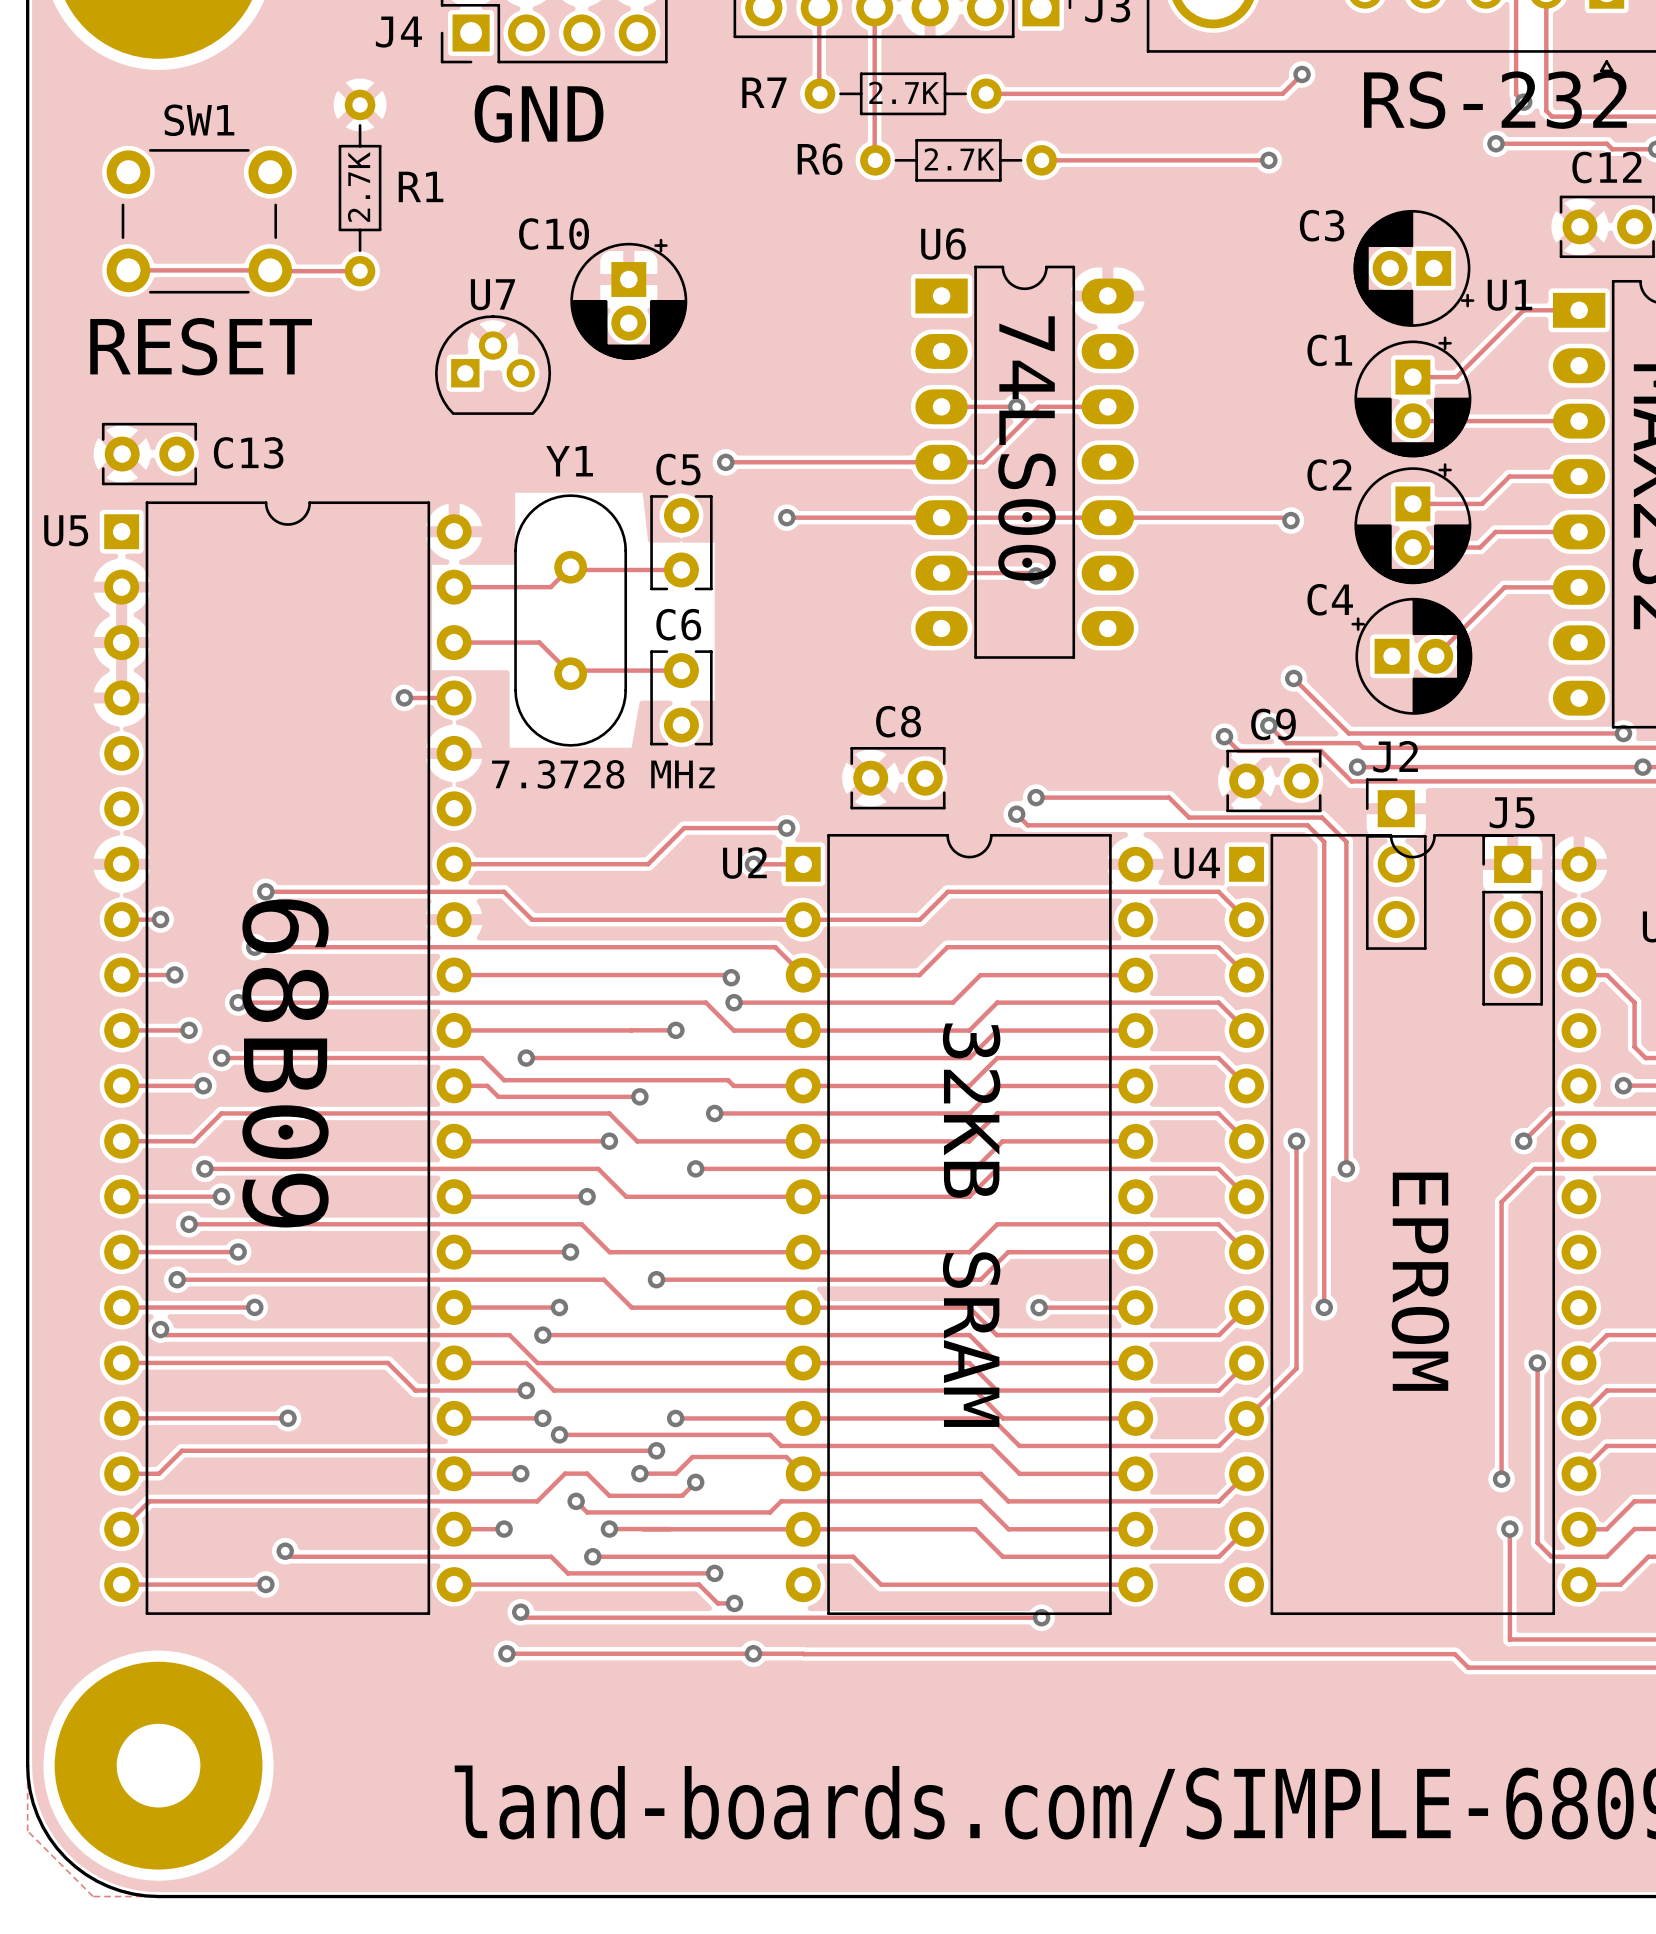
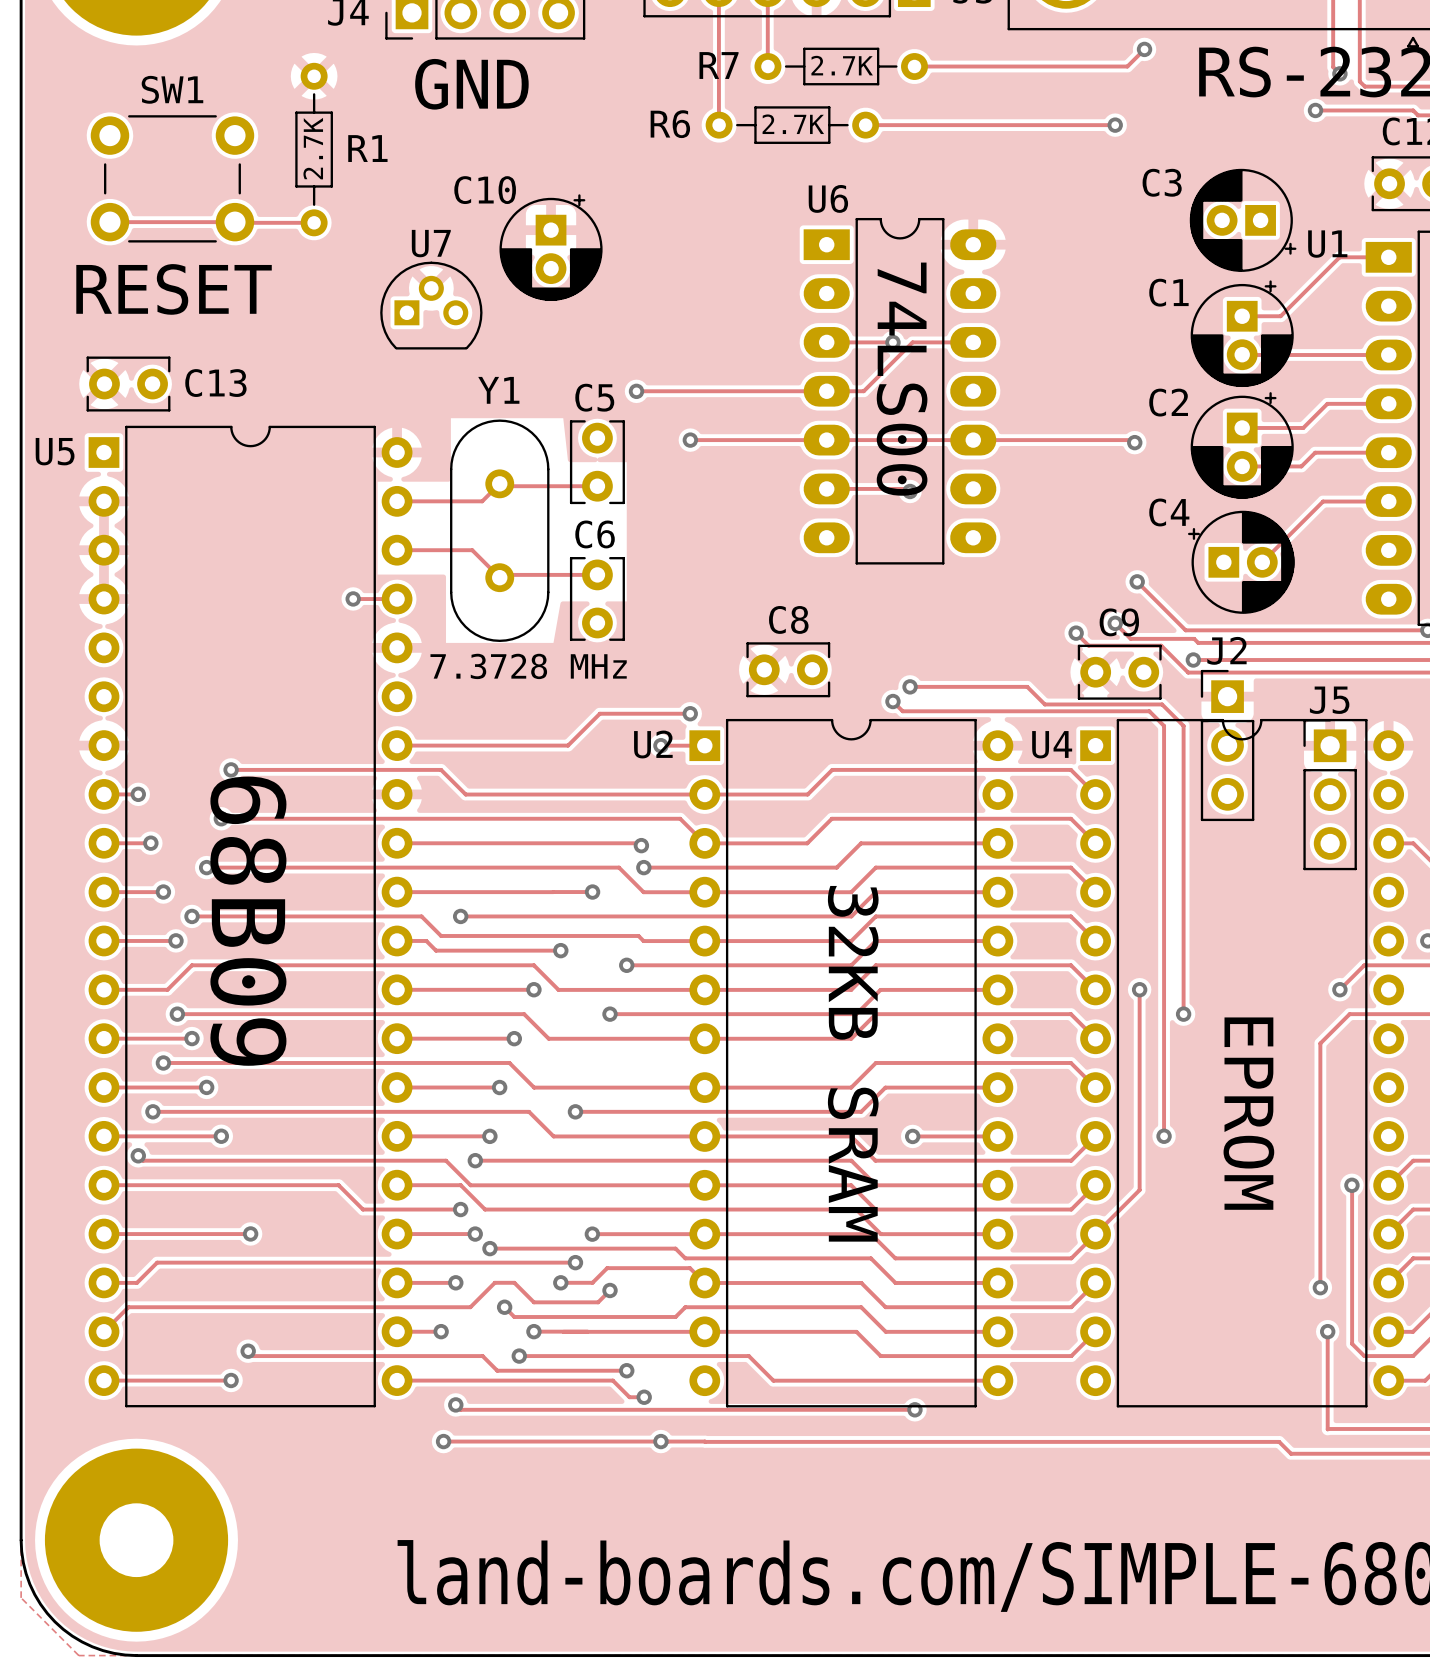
track: none -> (718, 65) (718, 124)
track: (874, 93) (874, 159) -> none
R7 position: (903, 93) -> (841, 66)
track: (986, 93) (1041, 93) -> none
R6 position: (958, 160) -> (792, 125)
track: none -> (865, 125) (914, 125)

